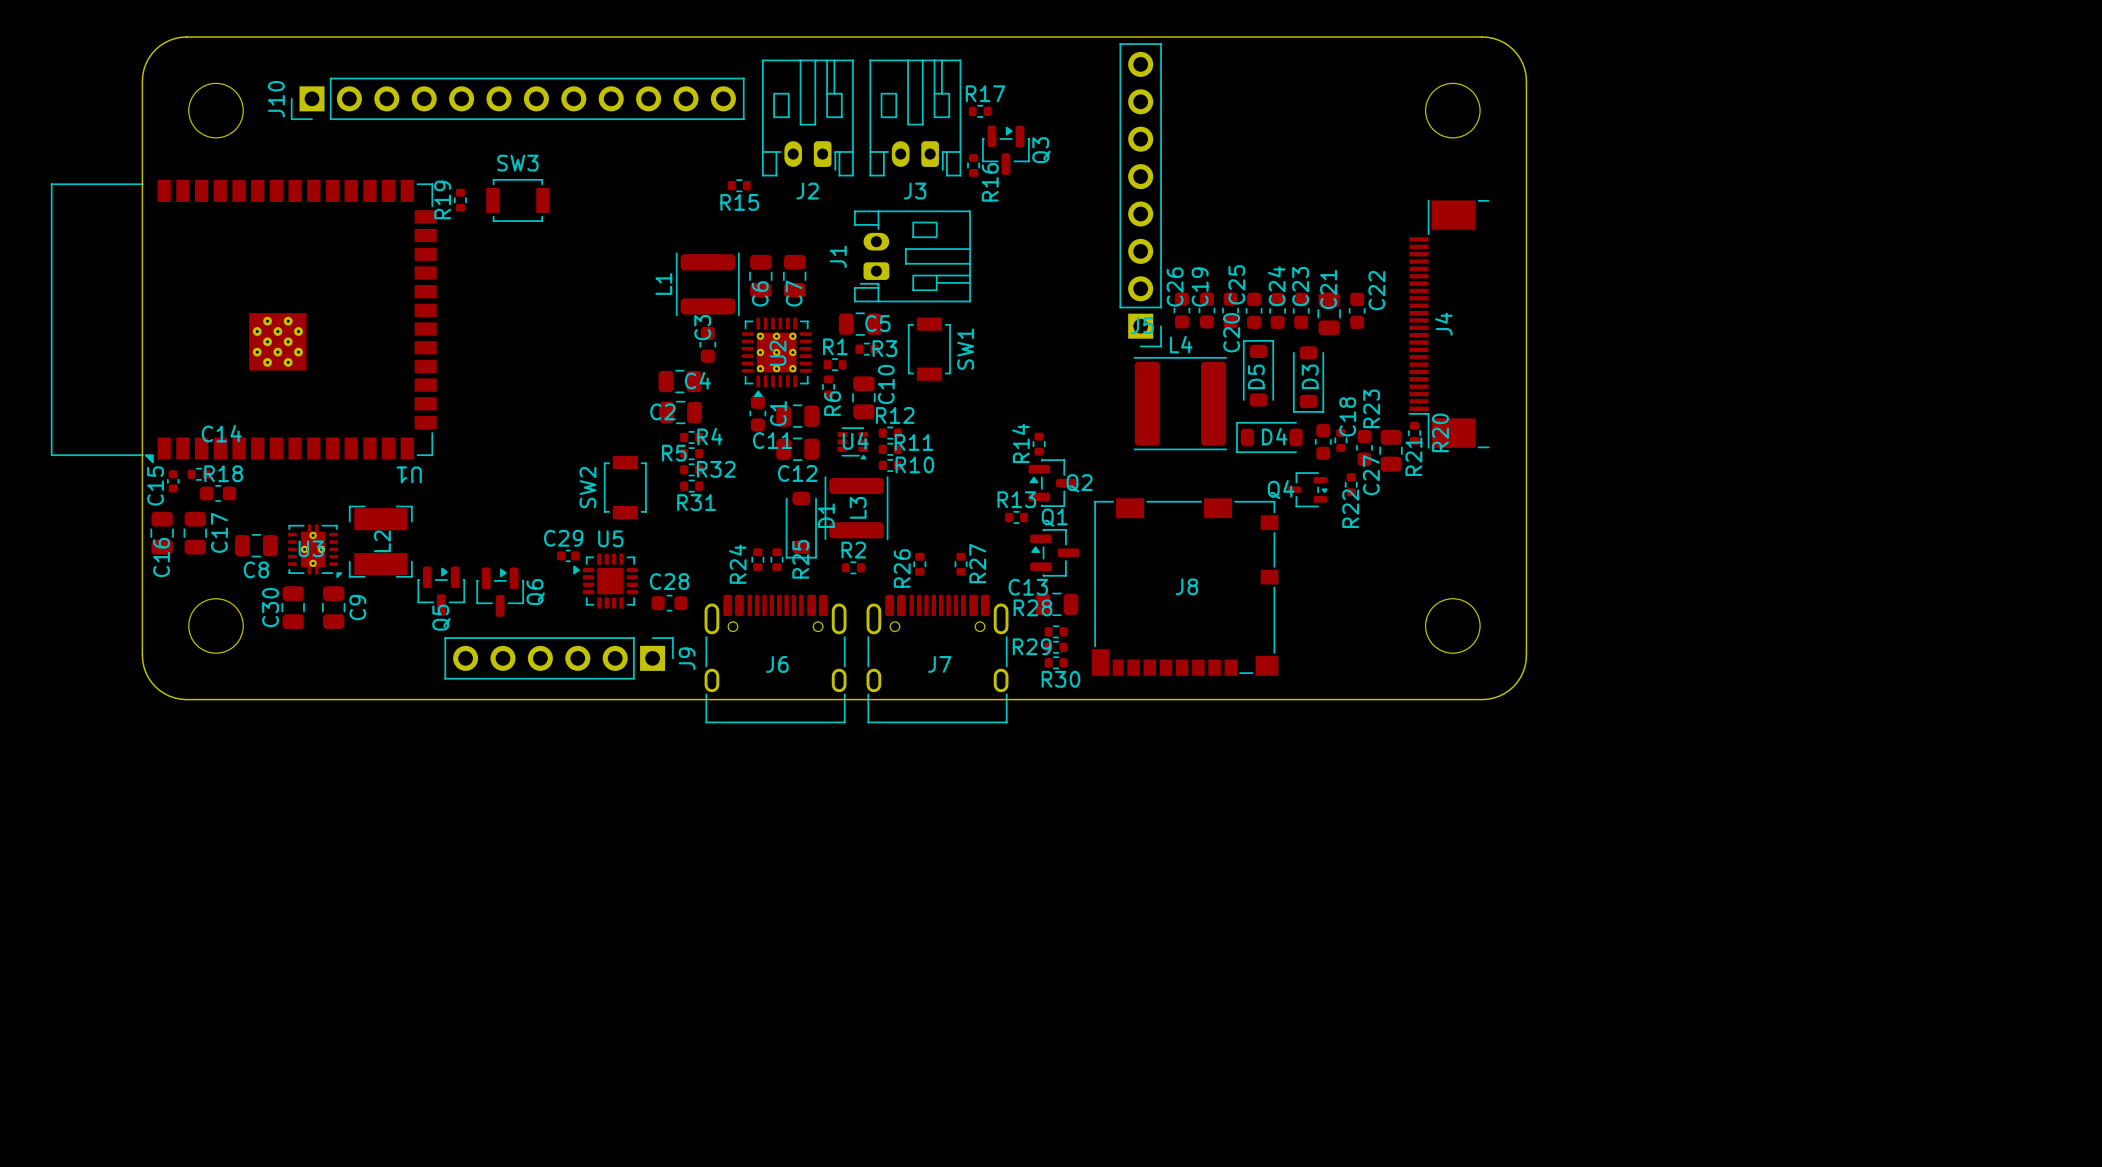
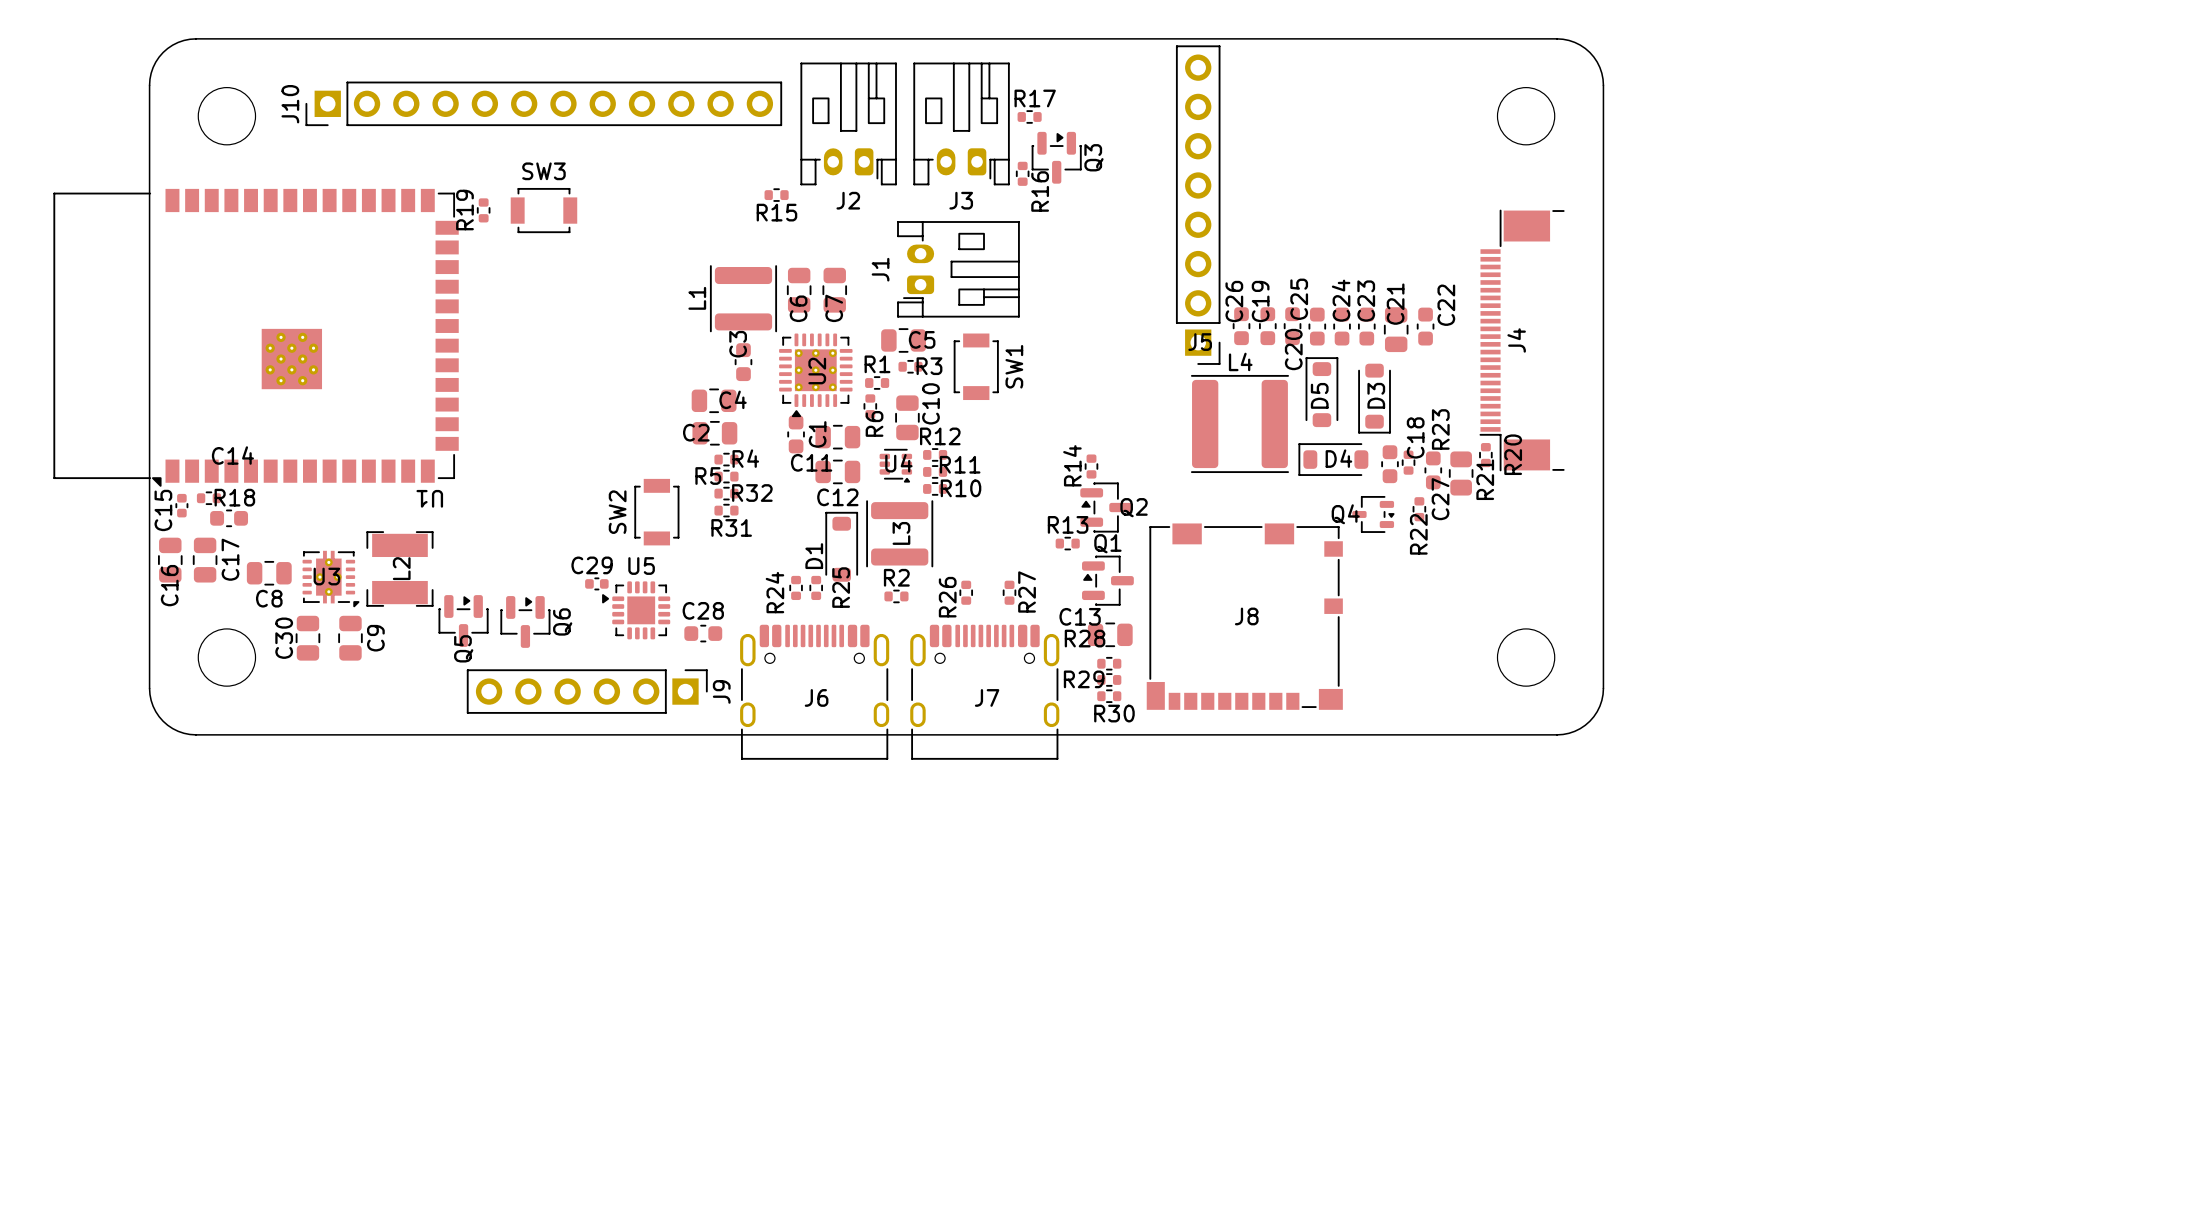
D1 rotation: 0° (801, 525) -> 180° (841, 546)

